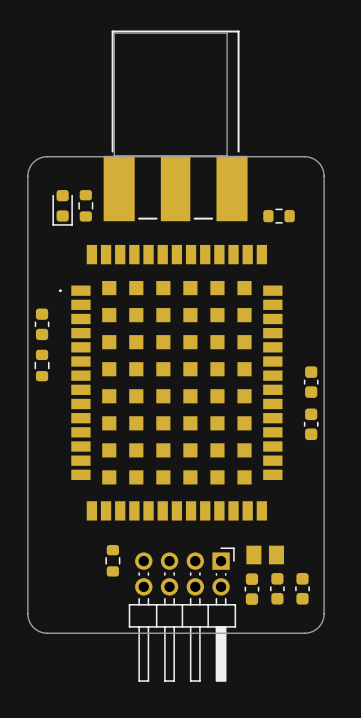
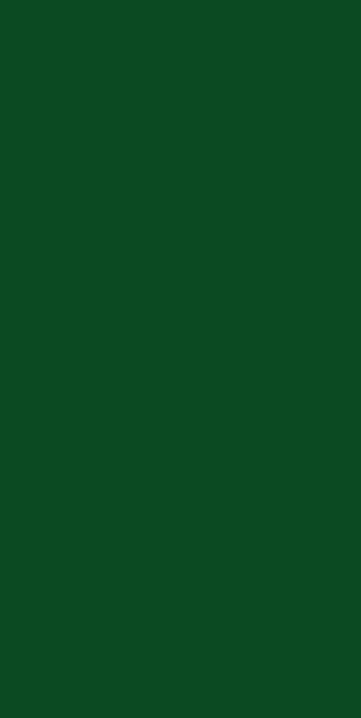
part: (175, 125) -> none
board edge: (47, 156) (304, 156) (314, 159) (321, 166) (324, 176) (324, 613) (321, 623) (314, 630) (304, 633) (47, 633) (37, 630) (30, 623) (27, 613) (27, 176) (33, 162) (47, 156) -> none
part: (85, 205) -> none
part: (62, 207) -> none
part: (279, 216) -> none
part: (42, 324) -> none
part: (42, 365) -> none
part: (170, 382) -> none
part: (311, 382) -> none
part: (311, 424) -> none
part: (265, 554) -> none
part: (112, 560) -> none
part: (277, 588) -> none
part: (302, 588) -> none
part: (251, 589) -> none
part: (182, 614) -> none

